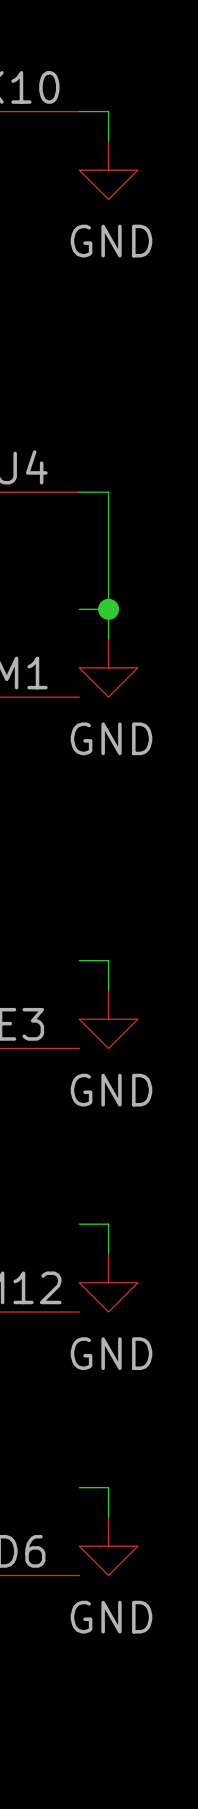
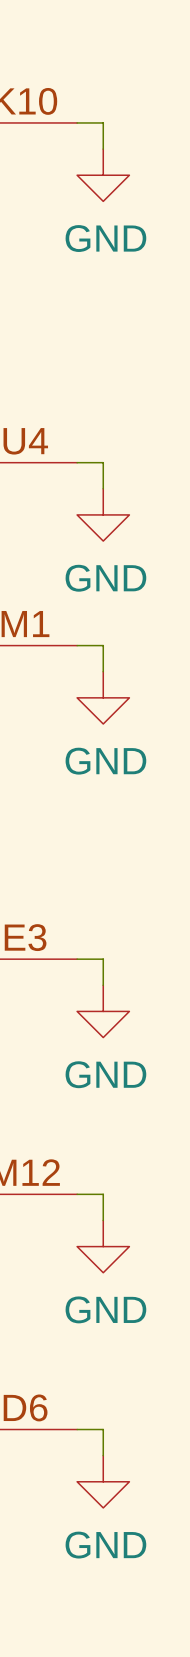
wire: (108, 521) (108, 638) -> none
power symbol: none -> GND (103, 514)
wire: (79, 609) (108, 609) -> none
junction: (108, 609) -> none
power symbol: GND (108, 667) -> none
wire: none -> (77, 645) (103, 645) (103, 671)
power symbol: none -> GND (103, 697)
wire: (79, 960) (108, 960) (108, 989) -> (77, 959) (103, 959) (103, 985)
power symbol: GND (108, 1019) -> none
power symbol: none -> GND (103, 1011)
wire: (79, 1224) (108, 1224) (108, 1253) -> (77, 1194) (103, 1194) (103, 1220)
power symbol: GND (108, 1282) -> none
power symbol: none -> GND (103, 1246)
wire: (79, 1487) (108, 1487) (108, 1516) -> (77, 1429) (103, 1429) (103, 1455)
power symbol: GND (108, 1546) -> none
power symbol: none -> GND (103, 1481)

